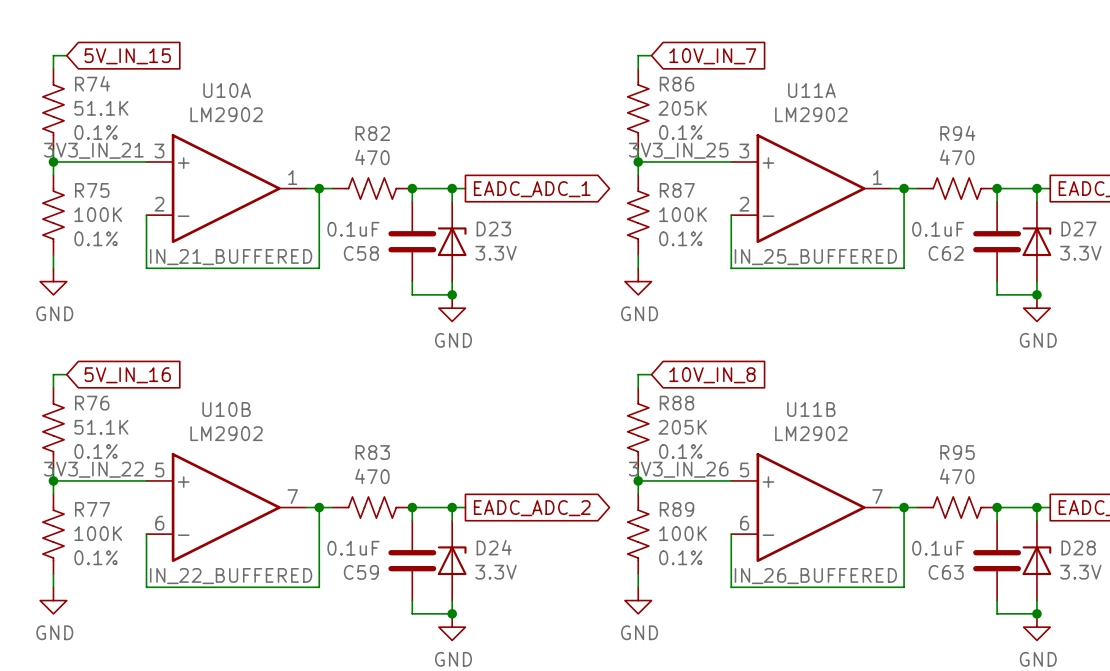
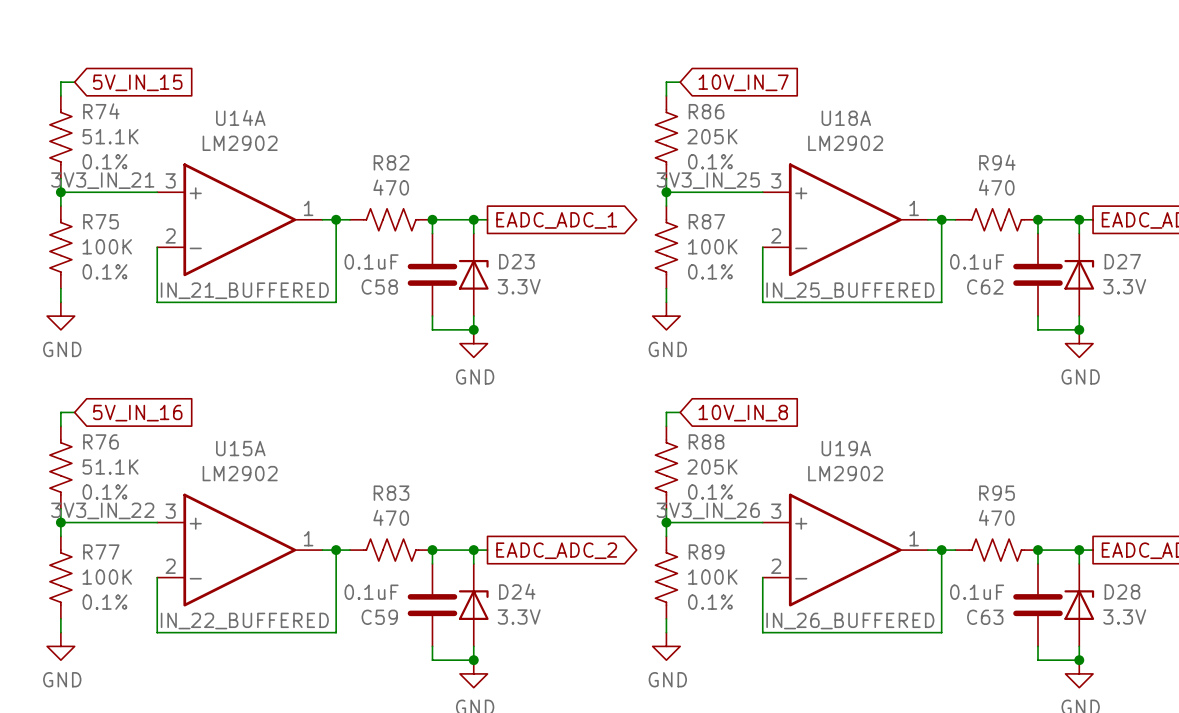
U10A name: U10A (227, 90) -> U14A (240, 117)
U11A name: U11A (811, 90) -> U18A (846, 118)
U10B name: U10B (226, 409) -> U15A (240, 448)
U11B name: U11B (811, 409) -> U19A (846, 448)
U10B pin number: 5 (159, 469) -> 3 (170, 511)
U11B pin number: 5 (744, 469) -> 3 (776, 511)
U10B pin number: 7 (292, 496) -> 1 (308, 538)
U11B pin number: 7 (877, 496) -> 1 (914, 538)
U10B pin number: 6 (159, 523) -> 2 (170, 566)
U11B pin number: 6 (744, 523) -> 2 (776, 566)

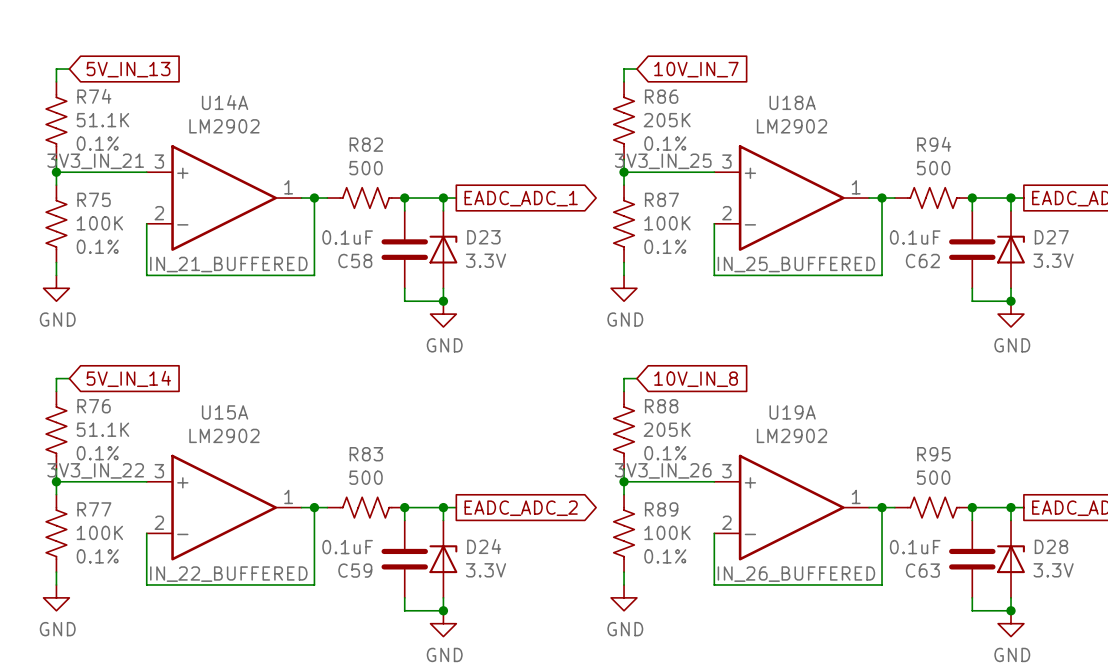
global label: 5V_IN_15 (137, 82) -> 5V_IN_13 (128, 69)
R82 value: 470 (391, 187) -> 500 (366, 168)
R94 value: 470 (996, 187) -> 500 (933, 168)
global label: 5V_IN_16 (137, 413) -> 5V_IN_14 (128, 378)
R83 value: 470 (391, 517) -> 500 (366, 477)
R95 value: 470 (996, 517) -> 500 (933, 477)

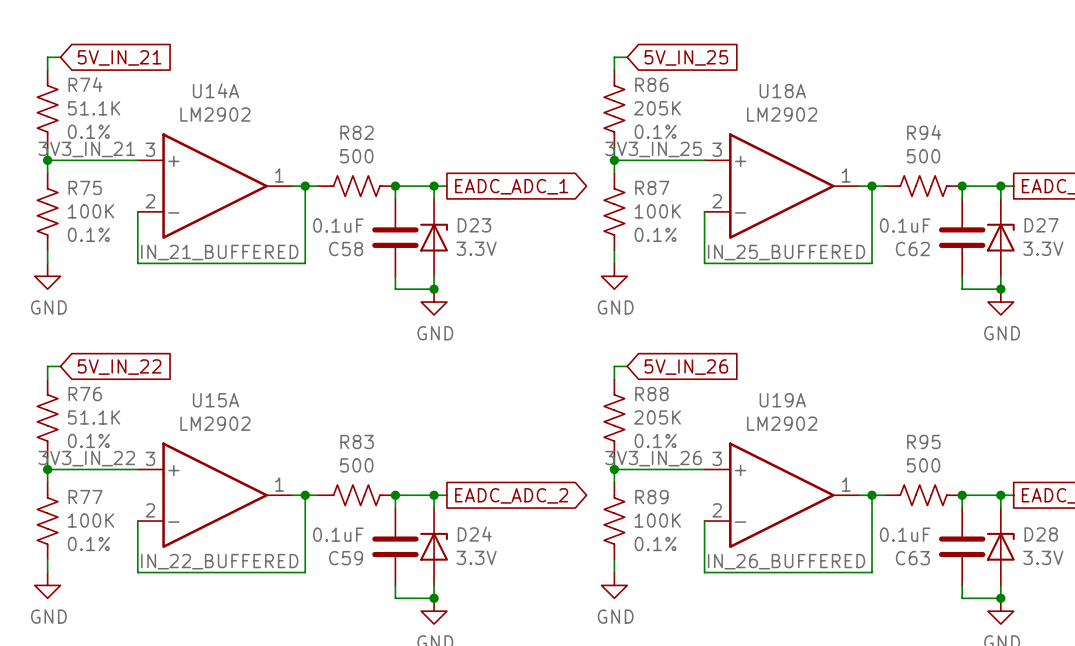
global label: 5V_IN_13 (128, 69) -> 5V_IN_21 (119, 57)
global label: 10V_IN_7 (696, 69) -> 5V_IN_25 (686, 57)
global label: 5V_IN_14 (128, 378) -> 5V_IN_22 (119, 367)
global label: 10V_IN_8 (696, 379) -> 5V_IN_26 (686, 367)

